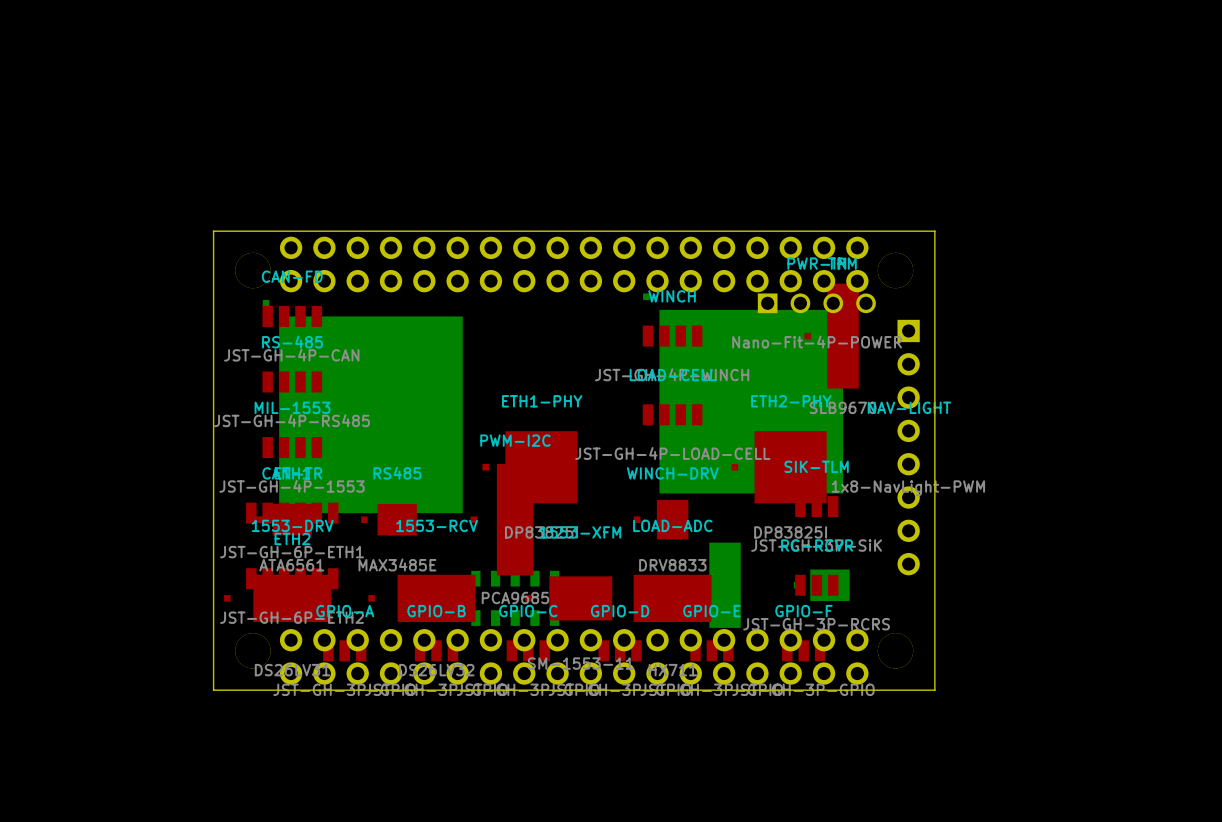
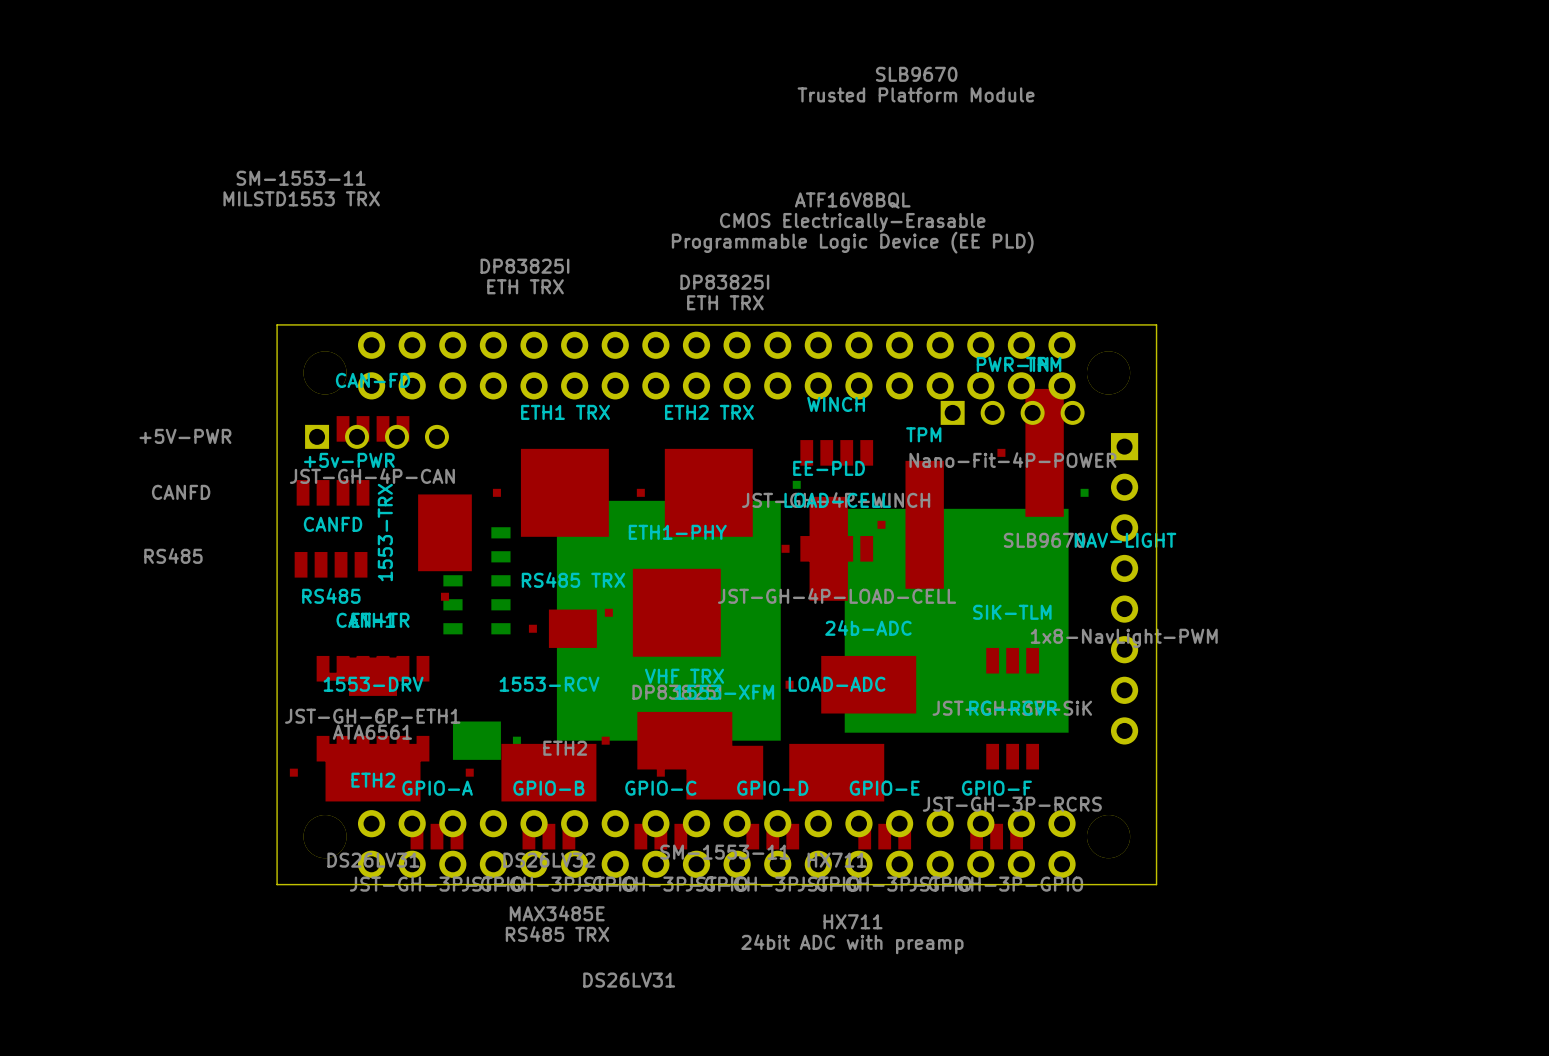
+5v-PWR: none -> +5V-PWR (377, 436)
CANFD: none -> CANFD (333, 492)
ETH1 TRX: none -> (550, 492)
ETH2 TRX: none -> (694, 492)
RS-485: JST-GH-4P-RS485 (292, 382) -> none
part rotation: 0° (743, 393) -> 90° clockwise (966, 610)
TPM: none -> (910, 524)
part: (362, 406) -> none
1553-TRX: none -> (444, 547)
EE-PLD: none -> (814, 548)
MIL-1553: JST-GH-4P-1553 (292, 447) -> none
part: none -> (678, 610)
ETH2-PHY: DP83825I (779, 467) -> none
RS485 name position: RS485 (397, 473) -> RS485 (331, 595)
RS485 TRX: none -> (562, 628)
RS485 footprint: [361, 503, 417, 536] -> [294, 552, 368, 578]
PWM-I2C: PCA9685 (502, 519) -> none
WINCH-DRV: DRV8833 (661, 519) -> none
24b-ADC: none -> (850, 684)
ETH2 name position: ETH2 (292, 538) -> ETH2 (373, 780)
RS485 value: MAX3485E (397, 564) -> RS485 (173, 556)
part: none -> (486, 740)
VHF TRX: none -> DS26LV31 (667, 740)
part: (713, 585) -> none
part: (821, 585) -> none
part rotation: 0° (515, 598) -> 90° clockwise (476, 580)
part position: (515, 598) -> (476, 580)
ETH2 value: JST-GH-6P-ETH2 (292, 617) -> ETH2 (565, 748)

